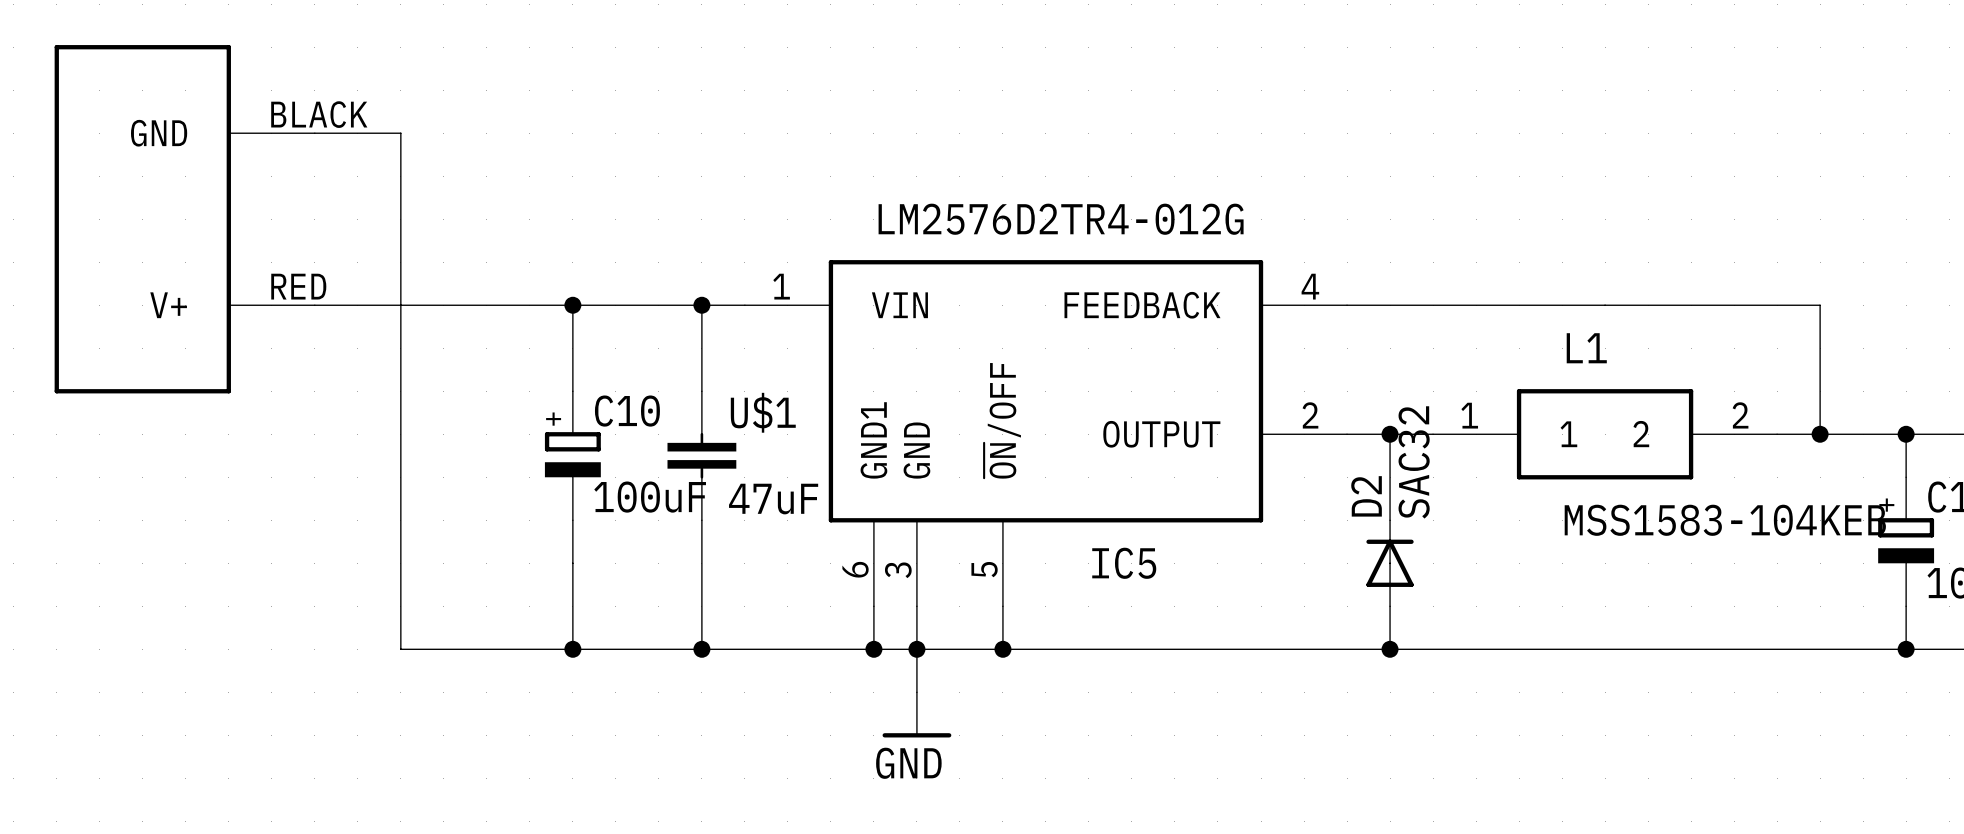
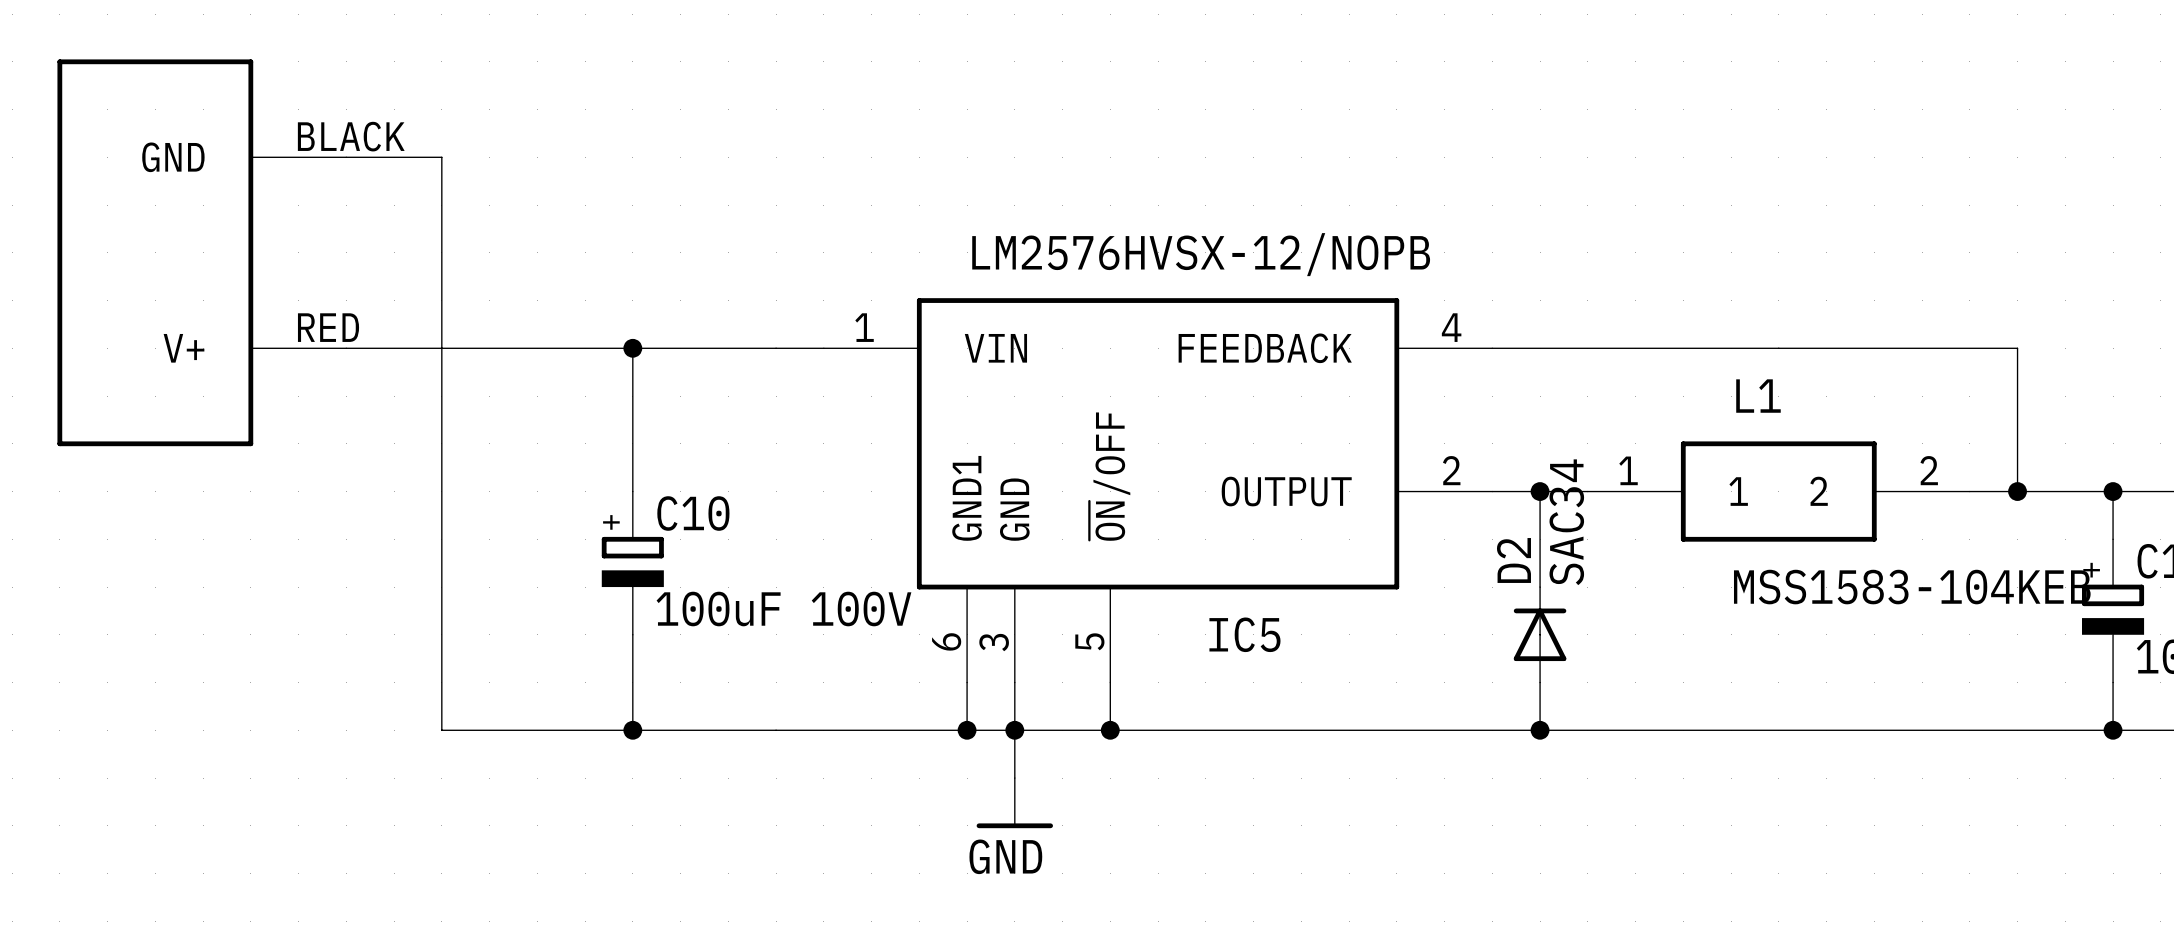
IC5 value: LM2576D2TR4-012G (1061, 219) -> LM2576HVSX-12/NOPB (1201, 254)
wire: (701, 305) (701, 391) -> none
junction: (701, 305) -> none
C10 position: (572, 455) -> (632, 563)
U$1: 47uF (701, 455) -> none
D2 value: SAC32 (1414, 462) -> SAC34 (1566, 522)
C10 value: 100uF (650, 497) -> 100uF 100V (783, 609)
wire: (701, 520) (701, 649) -> none
junction: (701, 649) -> none

